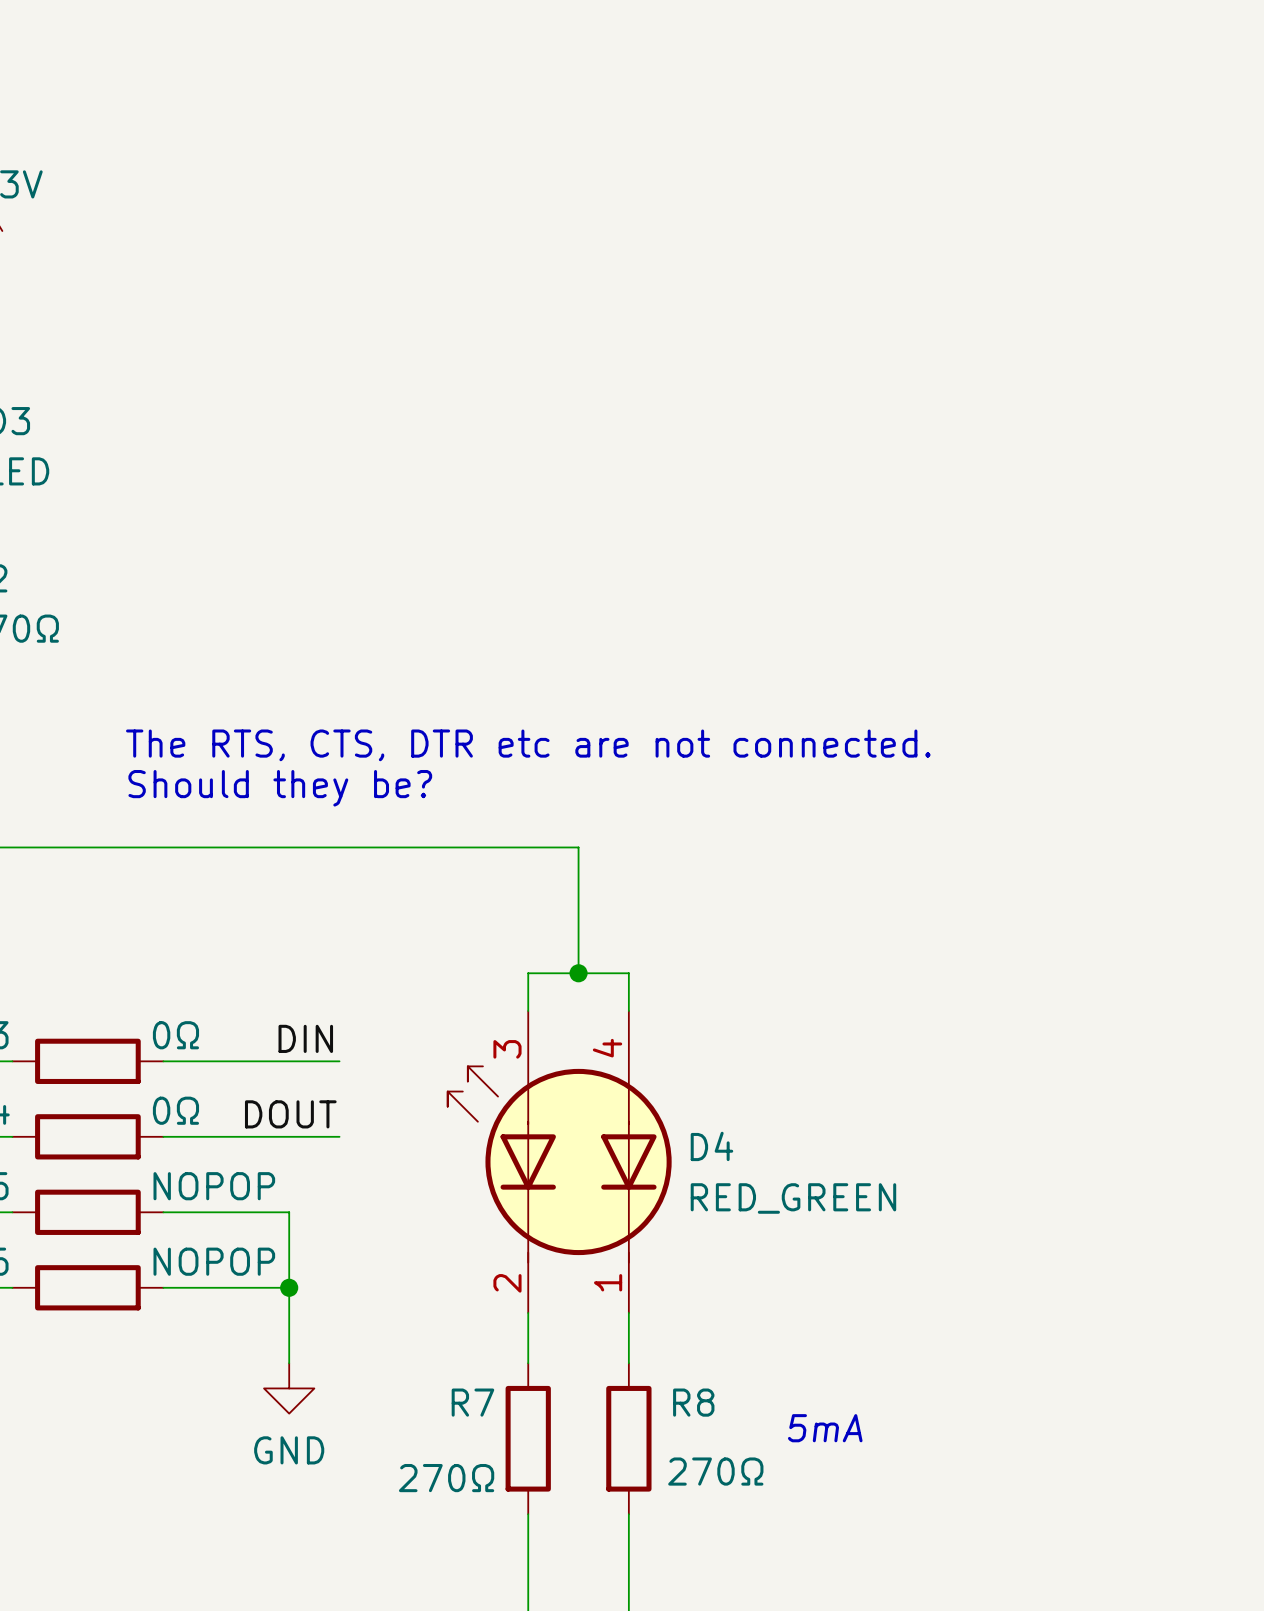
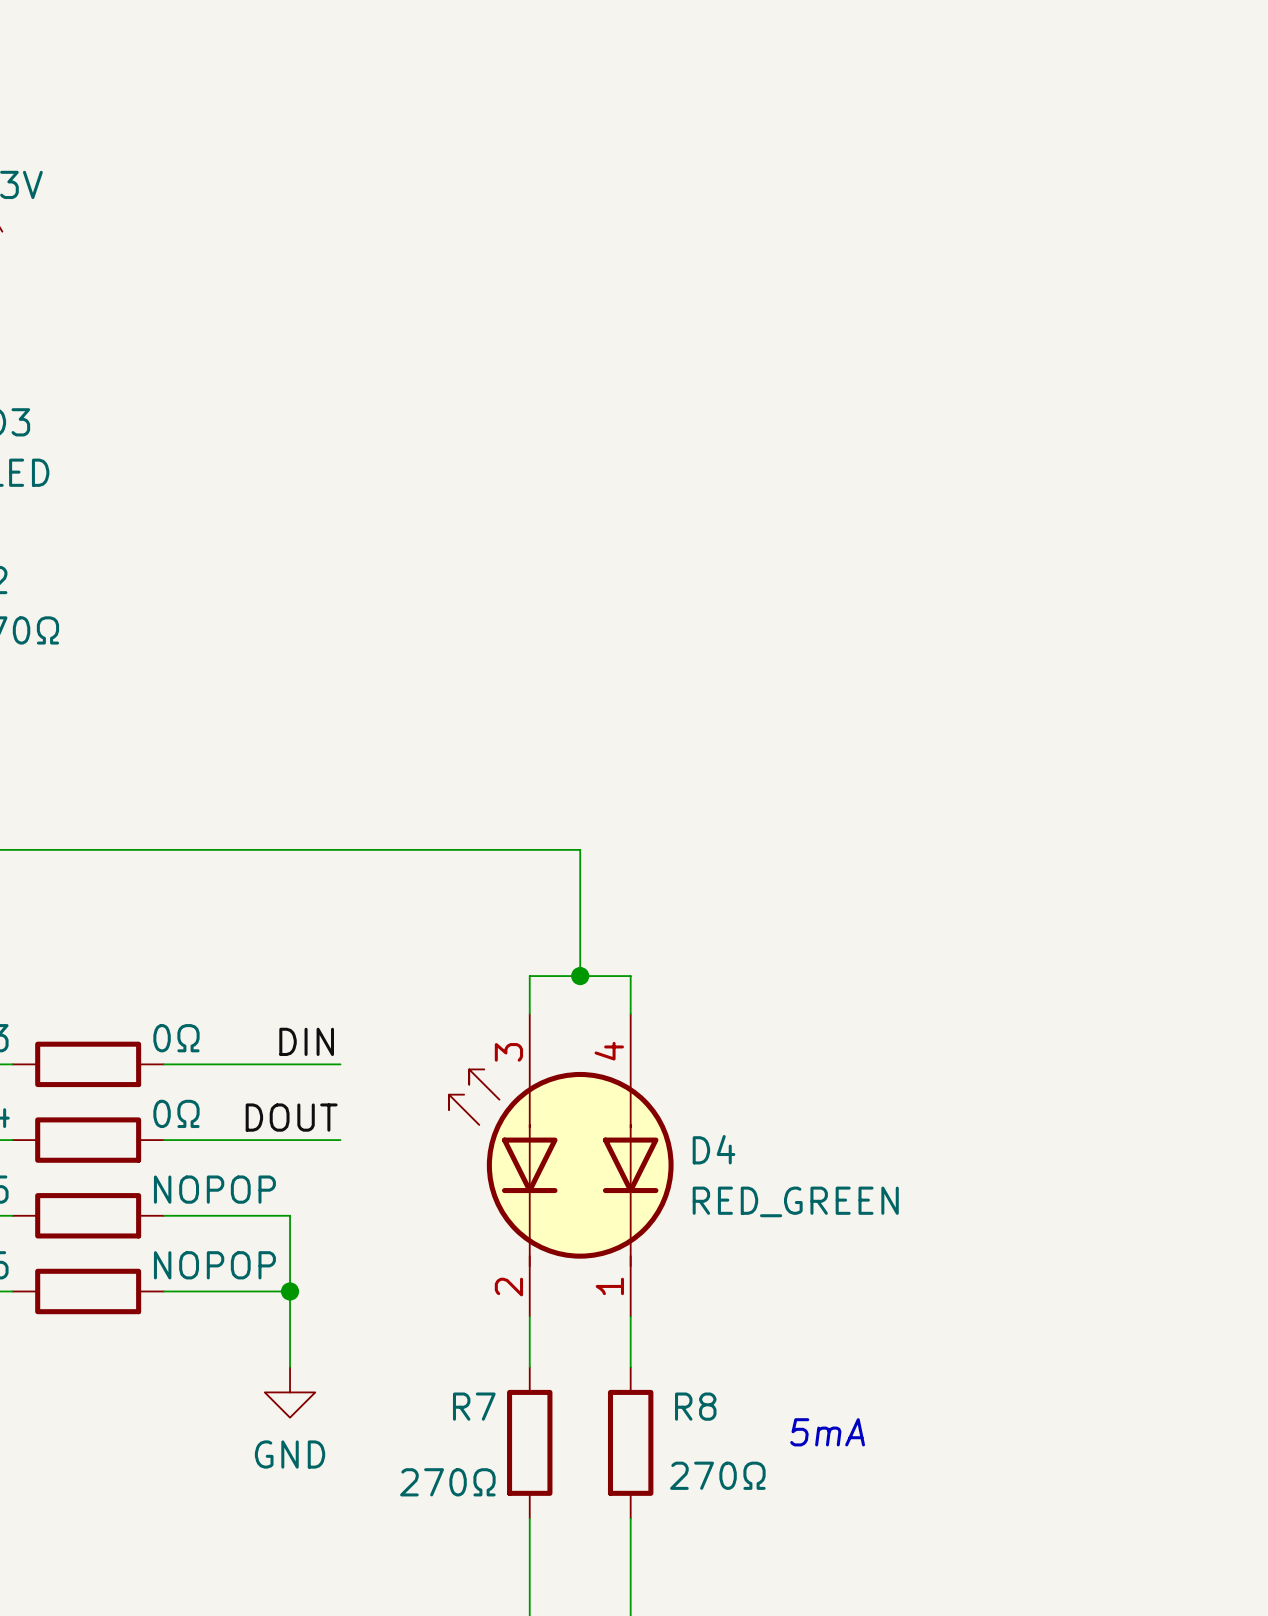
text: The RTS, CTS, DTR etc are not connected. (528, 745) -> none
text: Should they be? (280, 788) -> none

